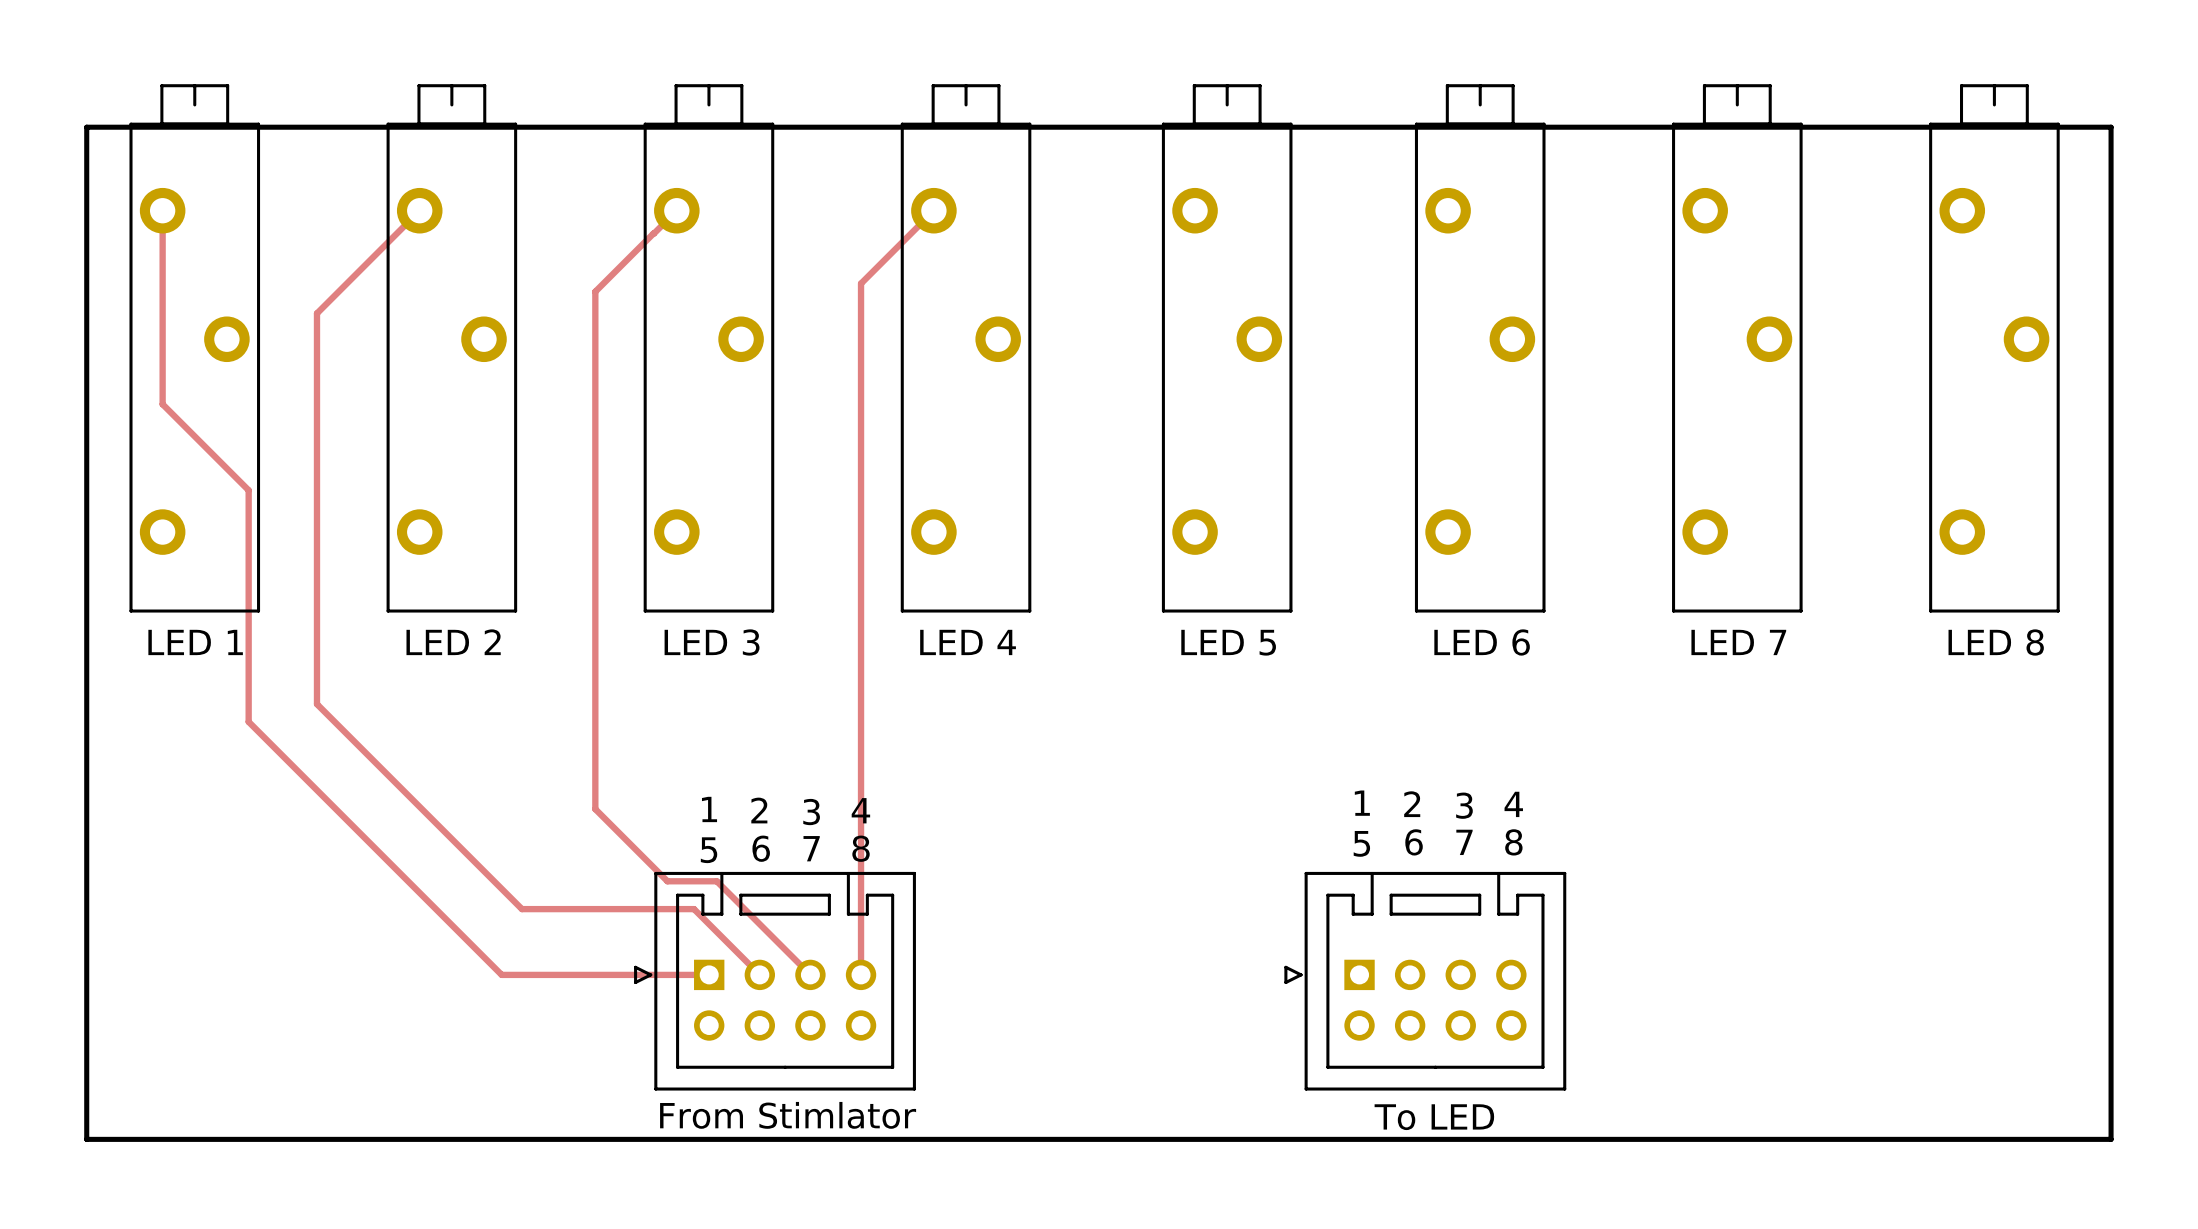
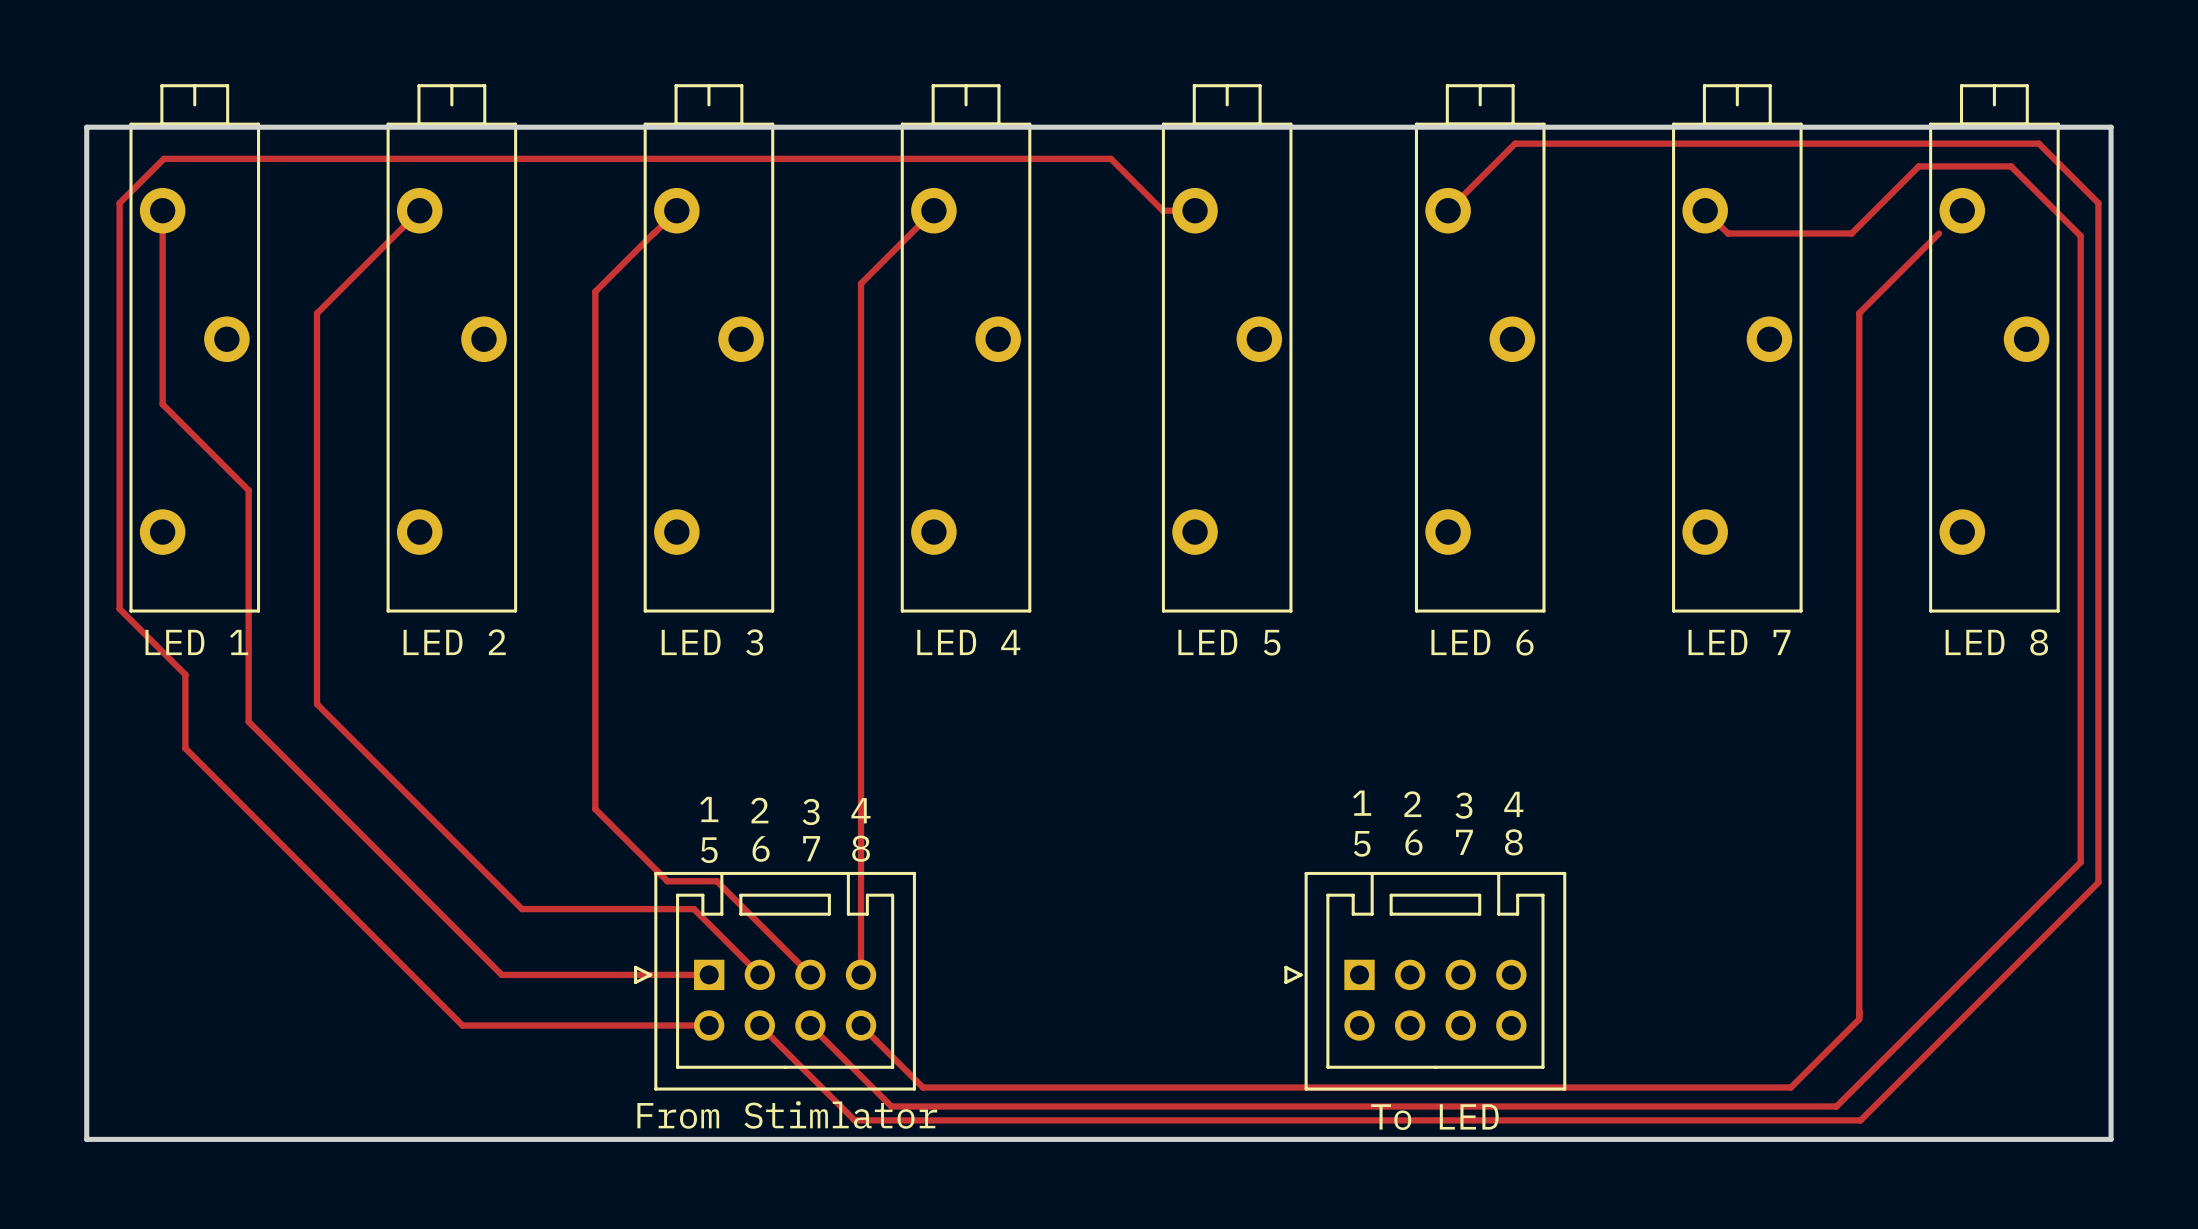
track: none -> (1195, 210) (1162, 210) (1110, 158) (163, 158) (119, 203) (119, 608) (185, 674) (185, 748) (462, 1025) (709, 1025)
track: none -> (1448, 210) (1515, 143) (2038, 143) (2098, 203) (2098, 882) (1860, 1120) (854, 1120) (759, 1025)
track: none -> (1705, 210) (1727, 233) (1851, 233) (1918, 166) (2011, 166) (2080, 236) (2080, 862) (1836, 1106) (891, 1106) (810, 1025)
track: none -> (1938, 233) (1859, 313) (1859, 1019) (1790, 1087) (923, 1087) (861, 1025)

